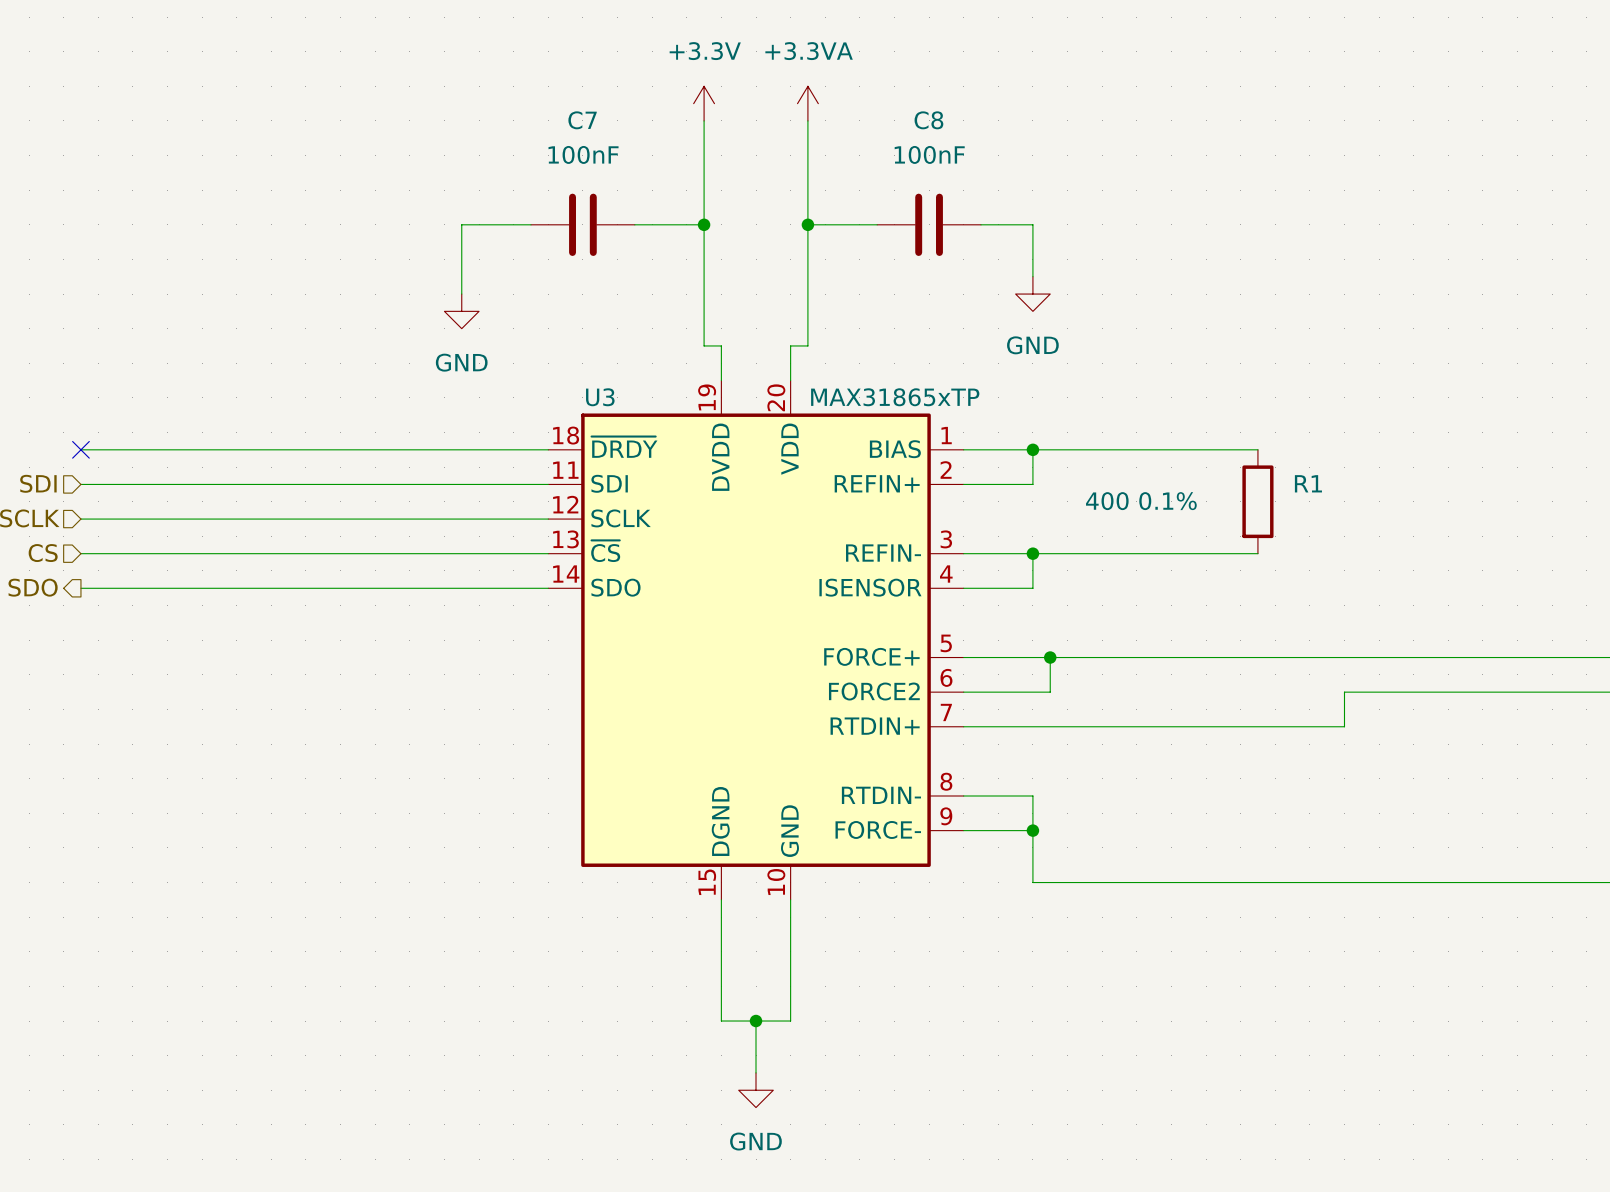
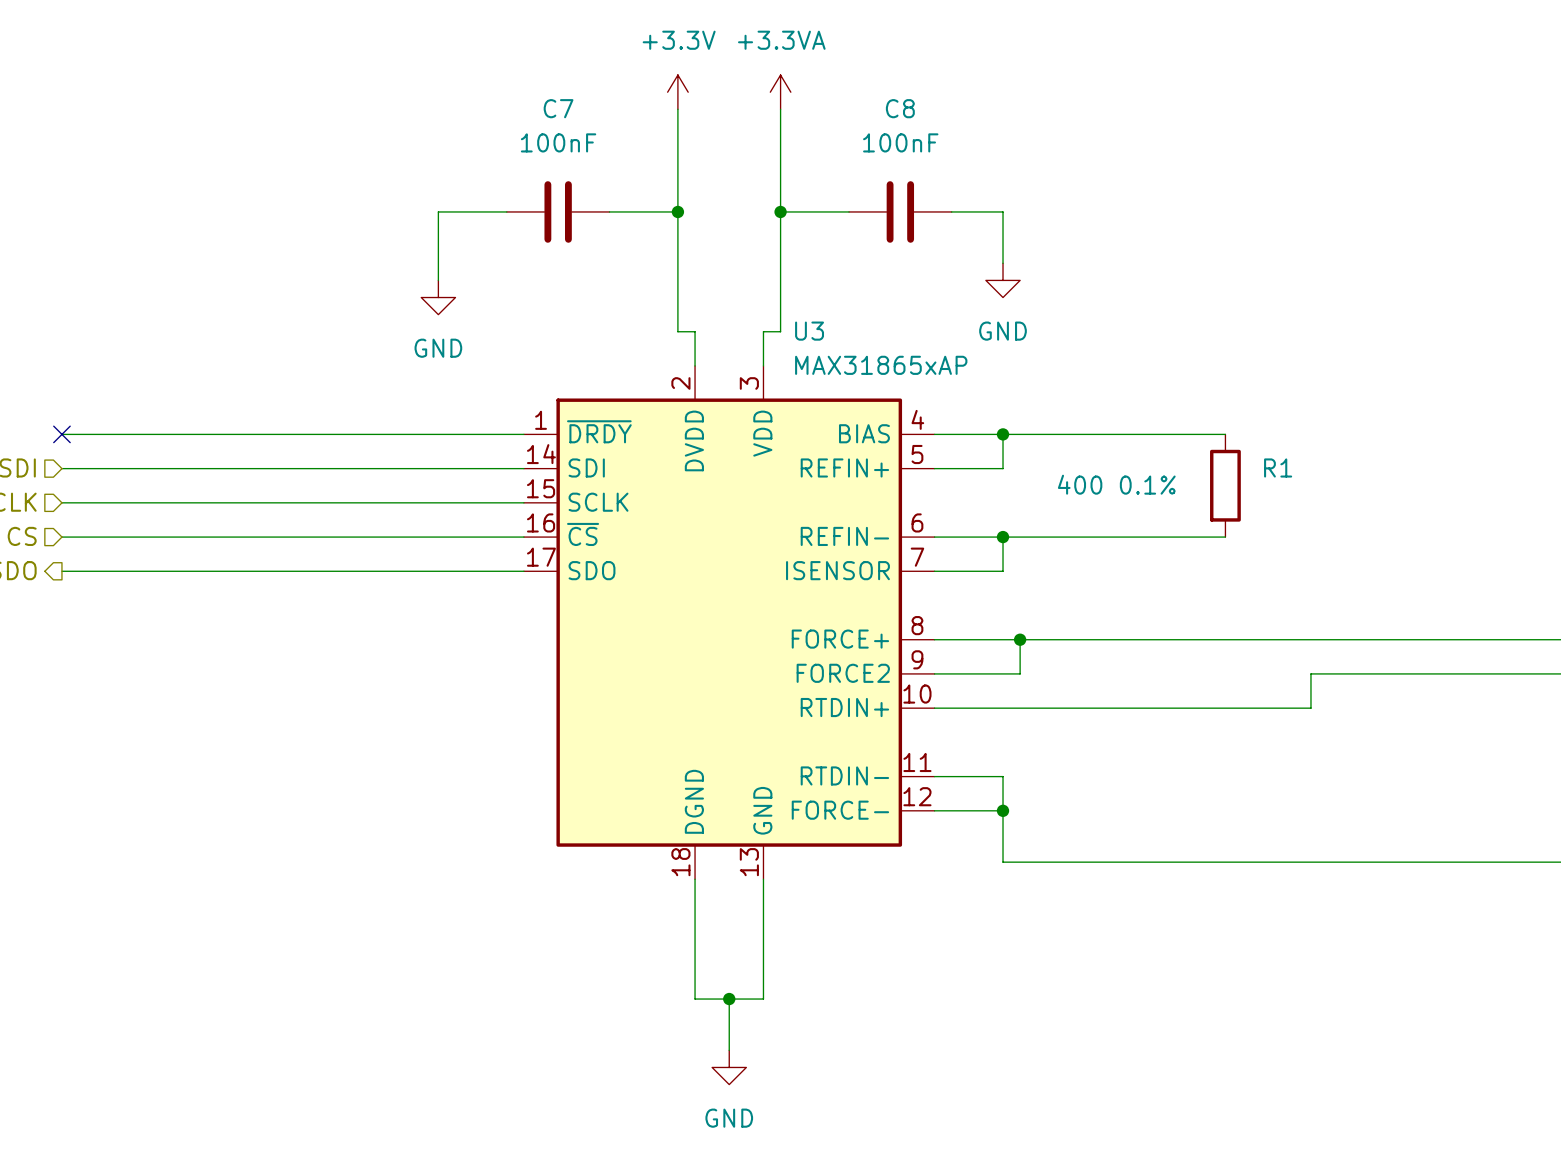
U3 symbol: [548, 380, 964, 900] -> [523, 365, 935, 880]
U3 name position: U3 (600, 397) -> U3 (809, 331)
U3 value: MAX31865xTP (895, 397) -> MAX31865xAP (881, 365)

